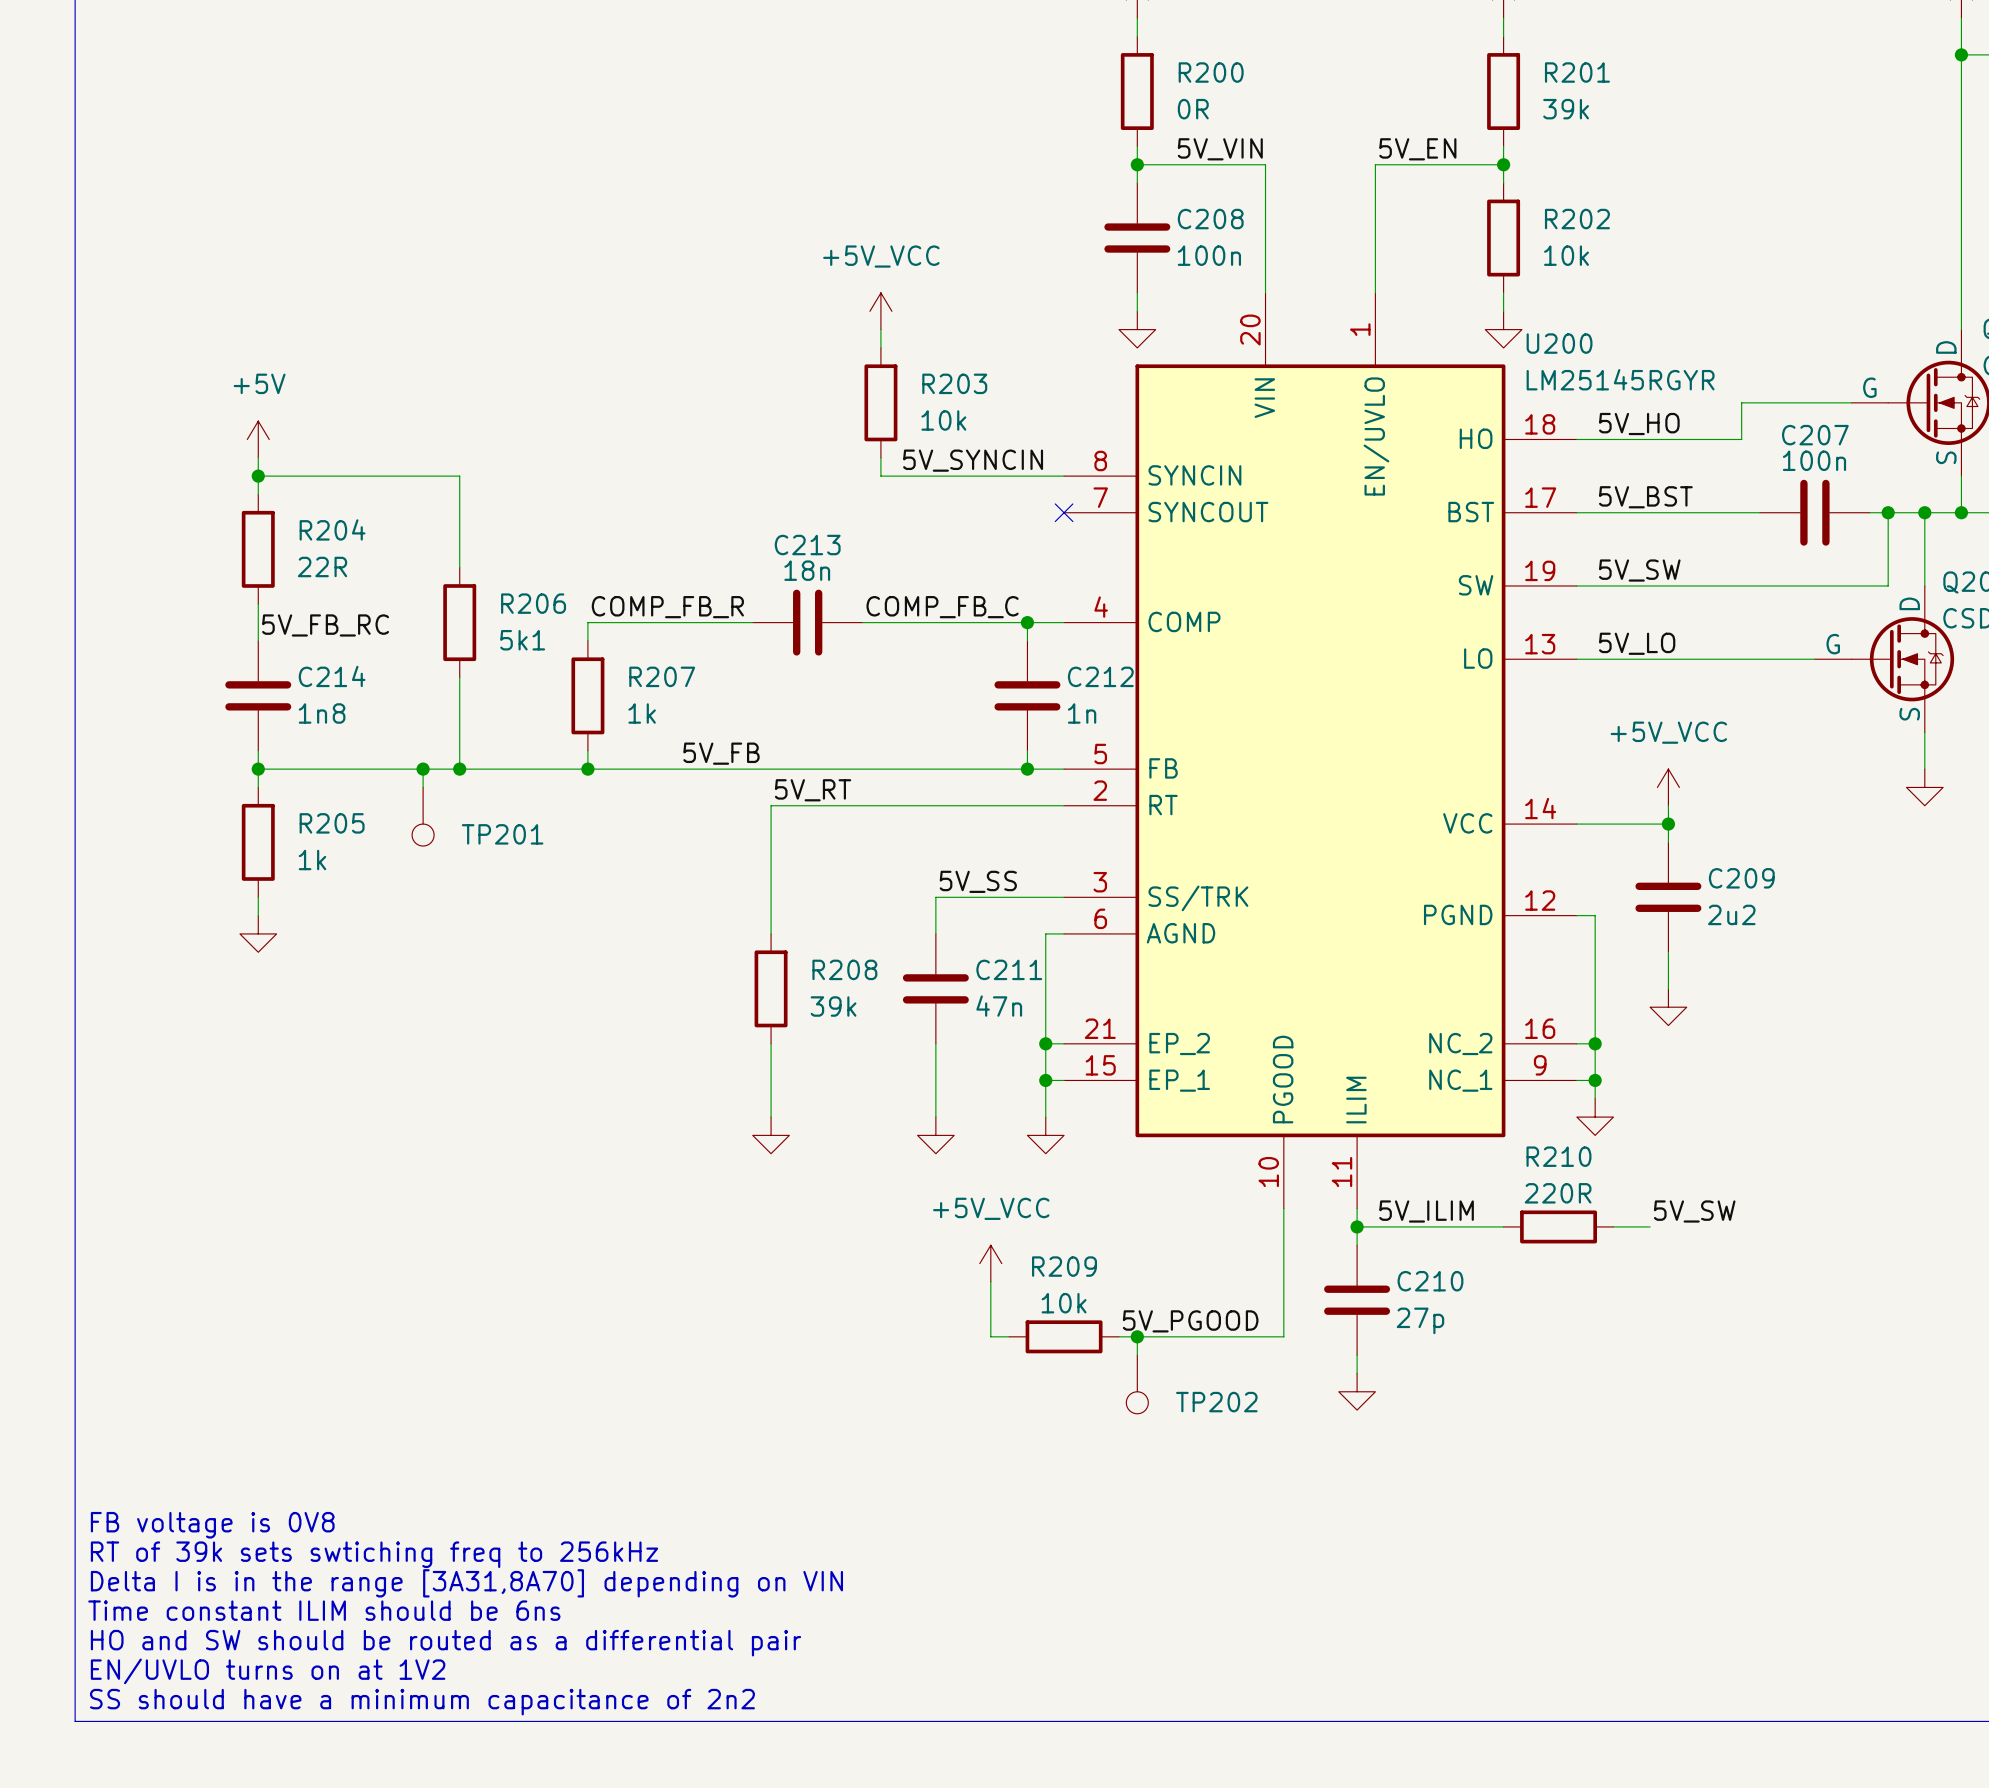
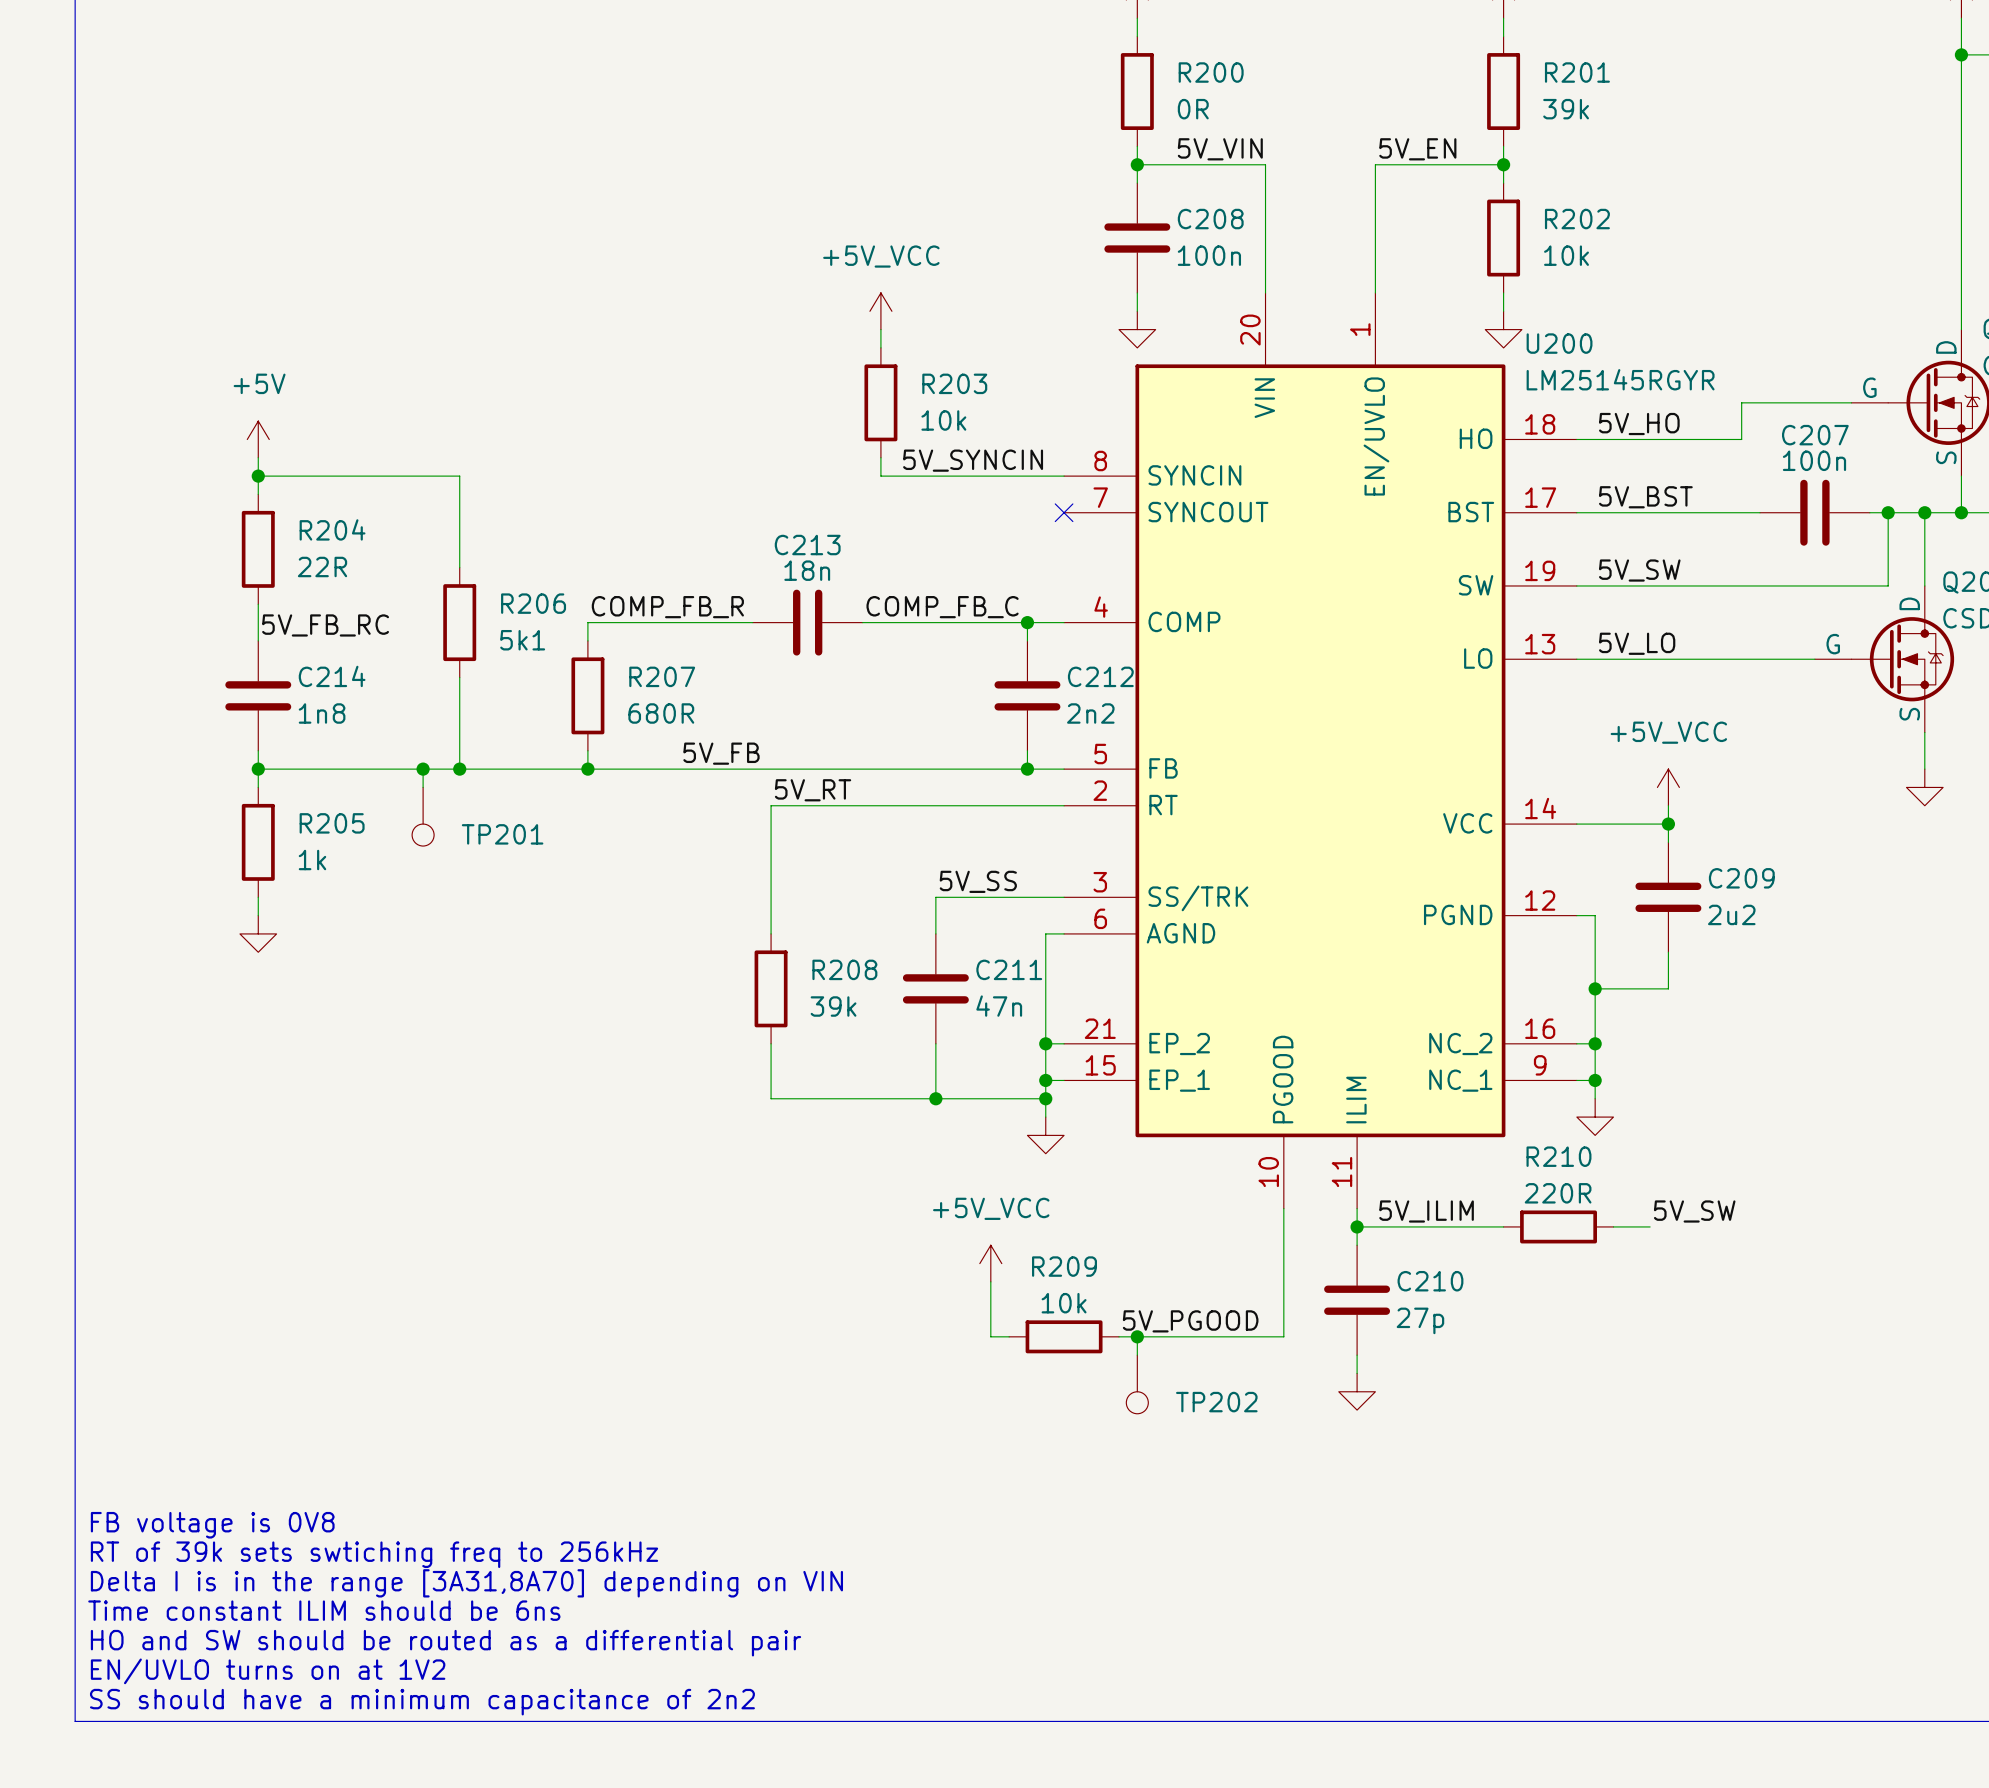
R207 value: 1k (642, 713) -> 680R (661, 713)
C212 value: 1n (1082, 713) -> 2n2 (1090, 713)
wire: none -> (1595, 988) (1668, 988)
junction: none -> (1595, 988)
power symbol: (1668, 1007) -> none
wire: (771, 1098) (771, 1117) -> (771, 1098) (1045, 1098)
wire: (935, 1098) (935, 1117) -> none
junction: none -> (935, 1098)
junction: none -> (1045, 1098)
power symbol: (771, 1135) -> none
power symbol: (935, 1135) -> none

